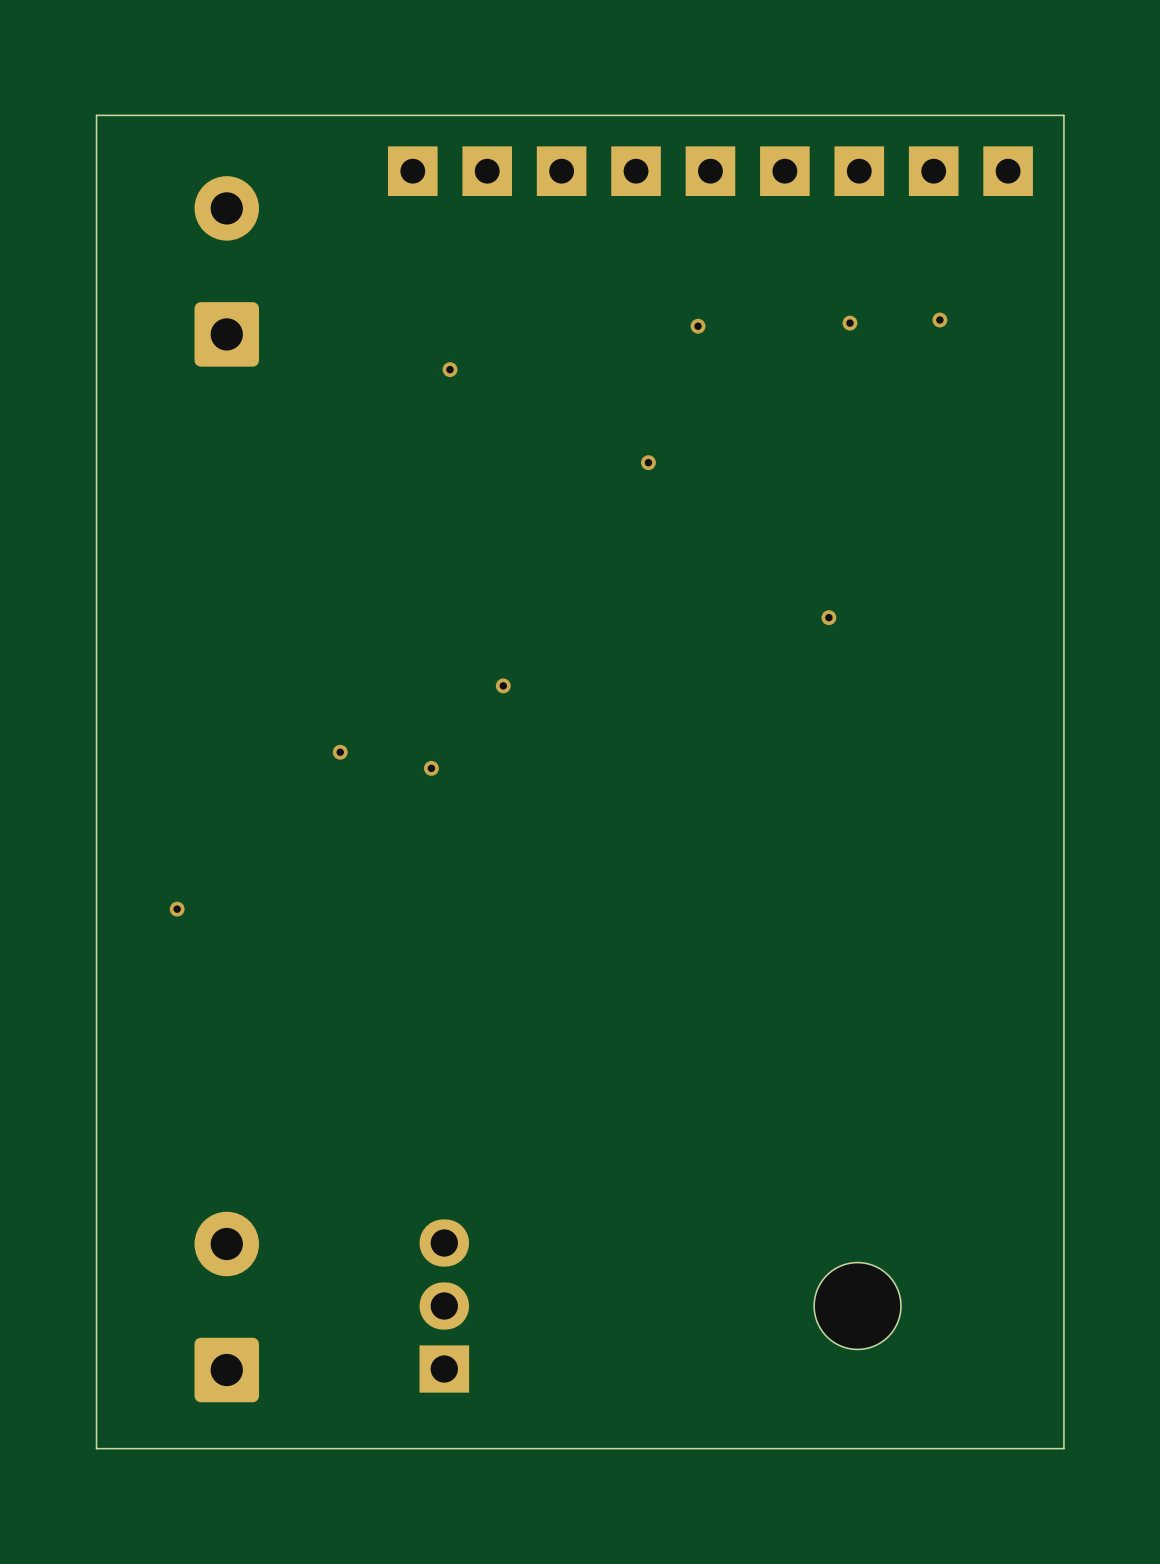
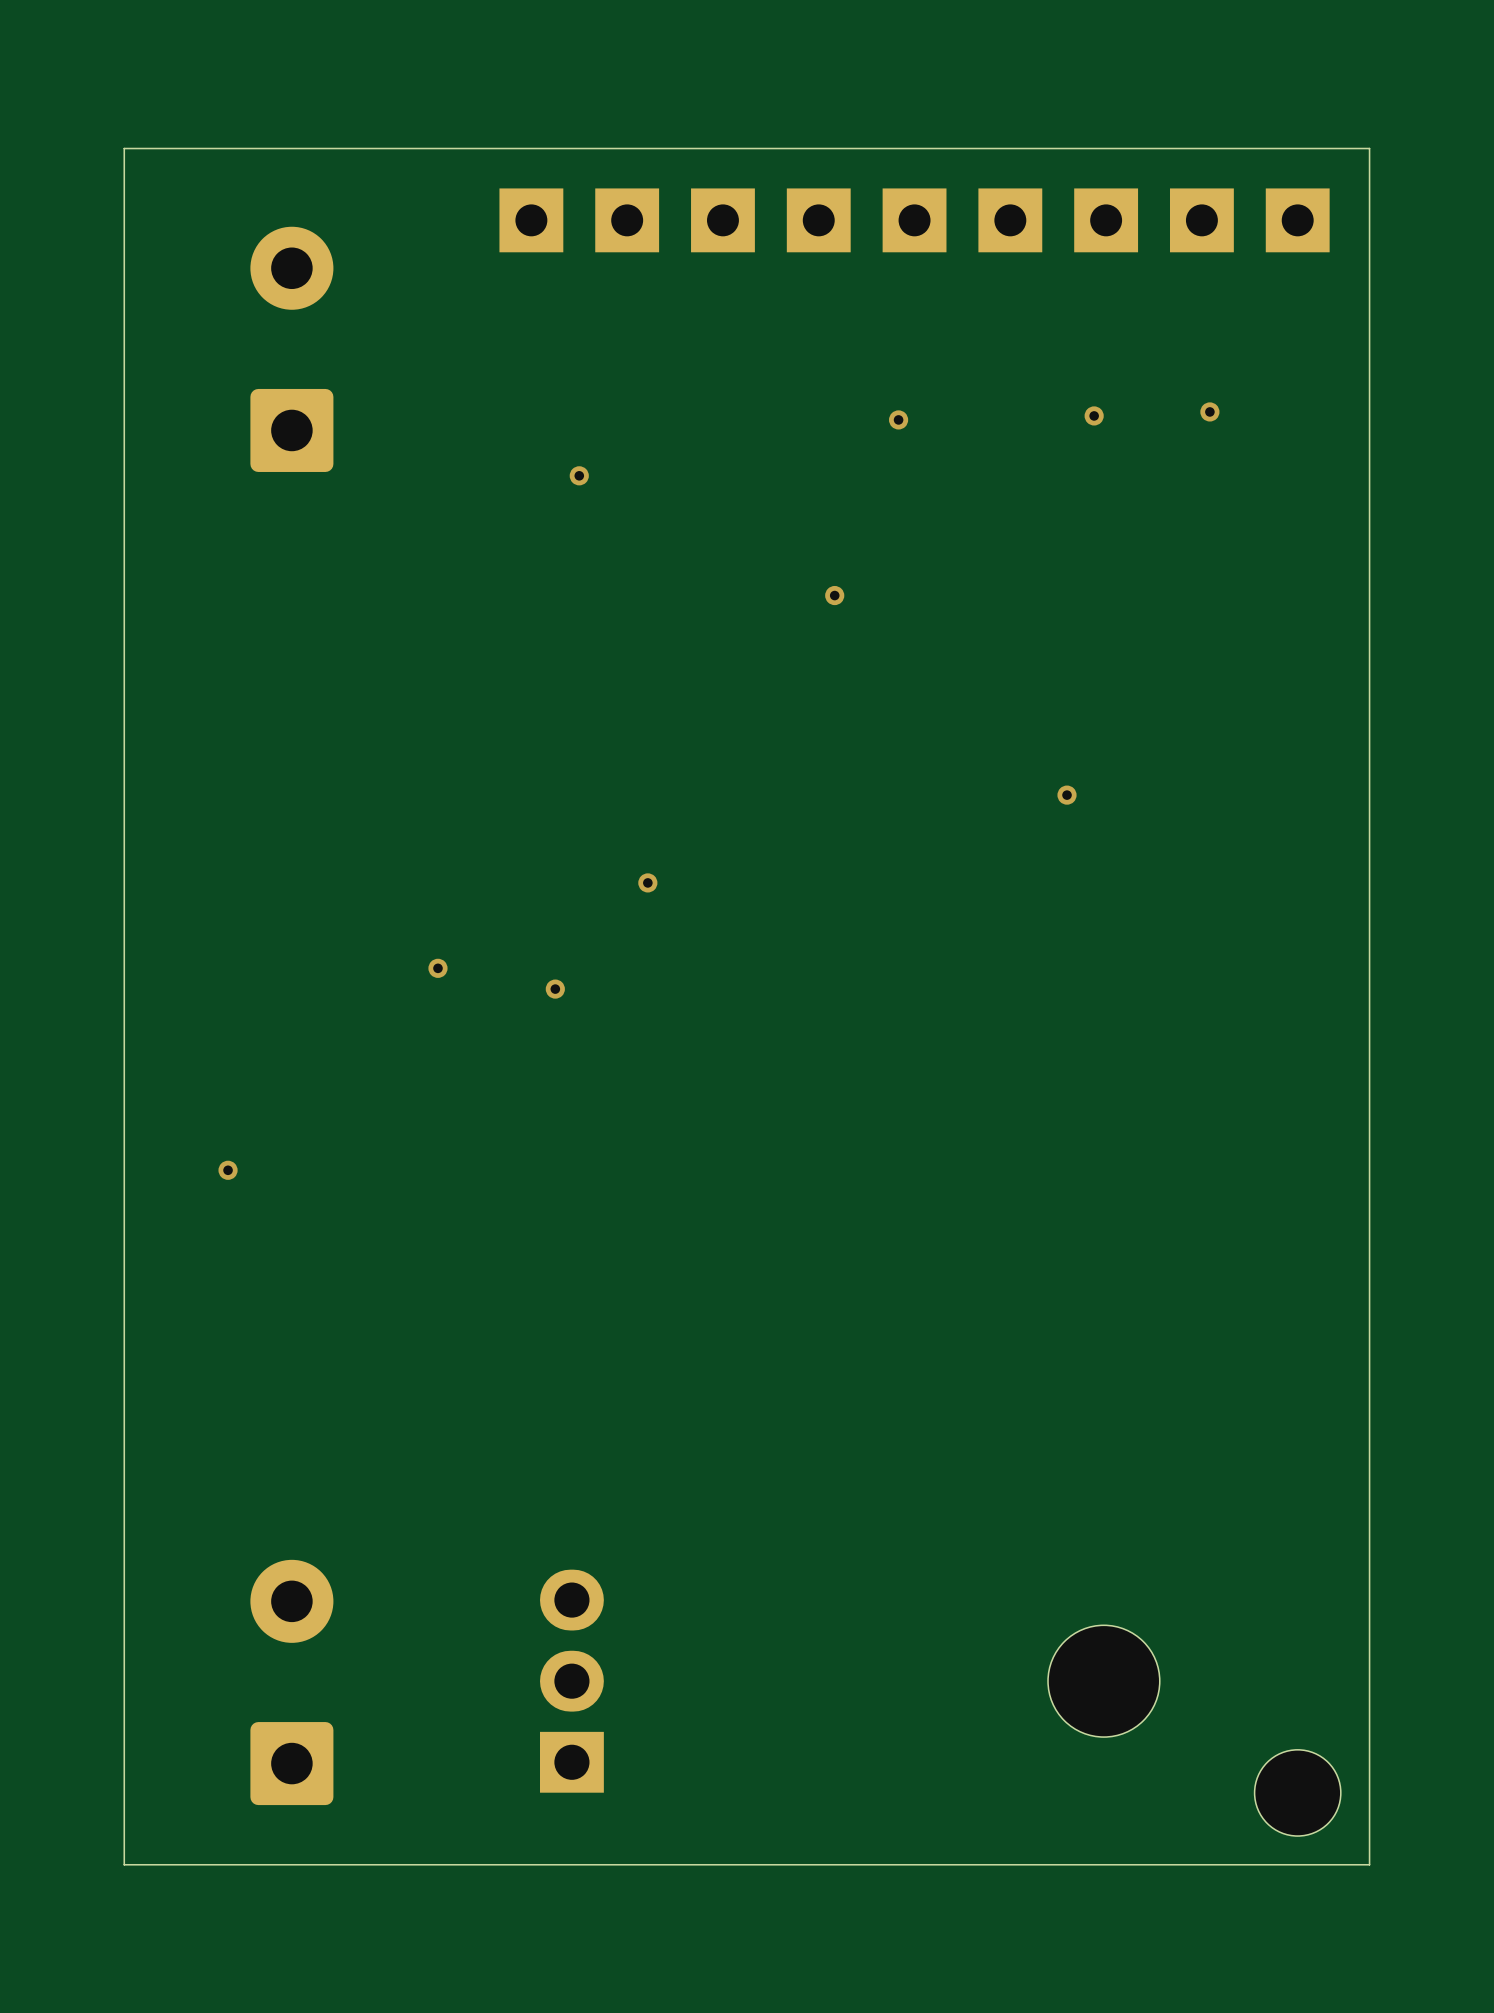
part: none -> (1297, 1792)

